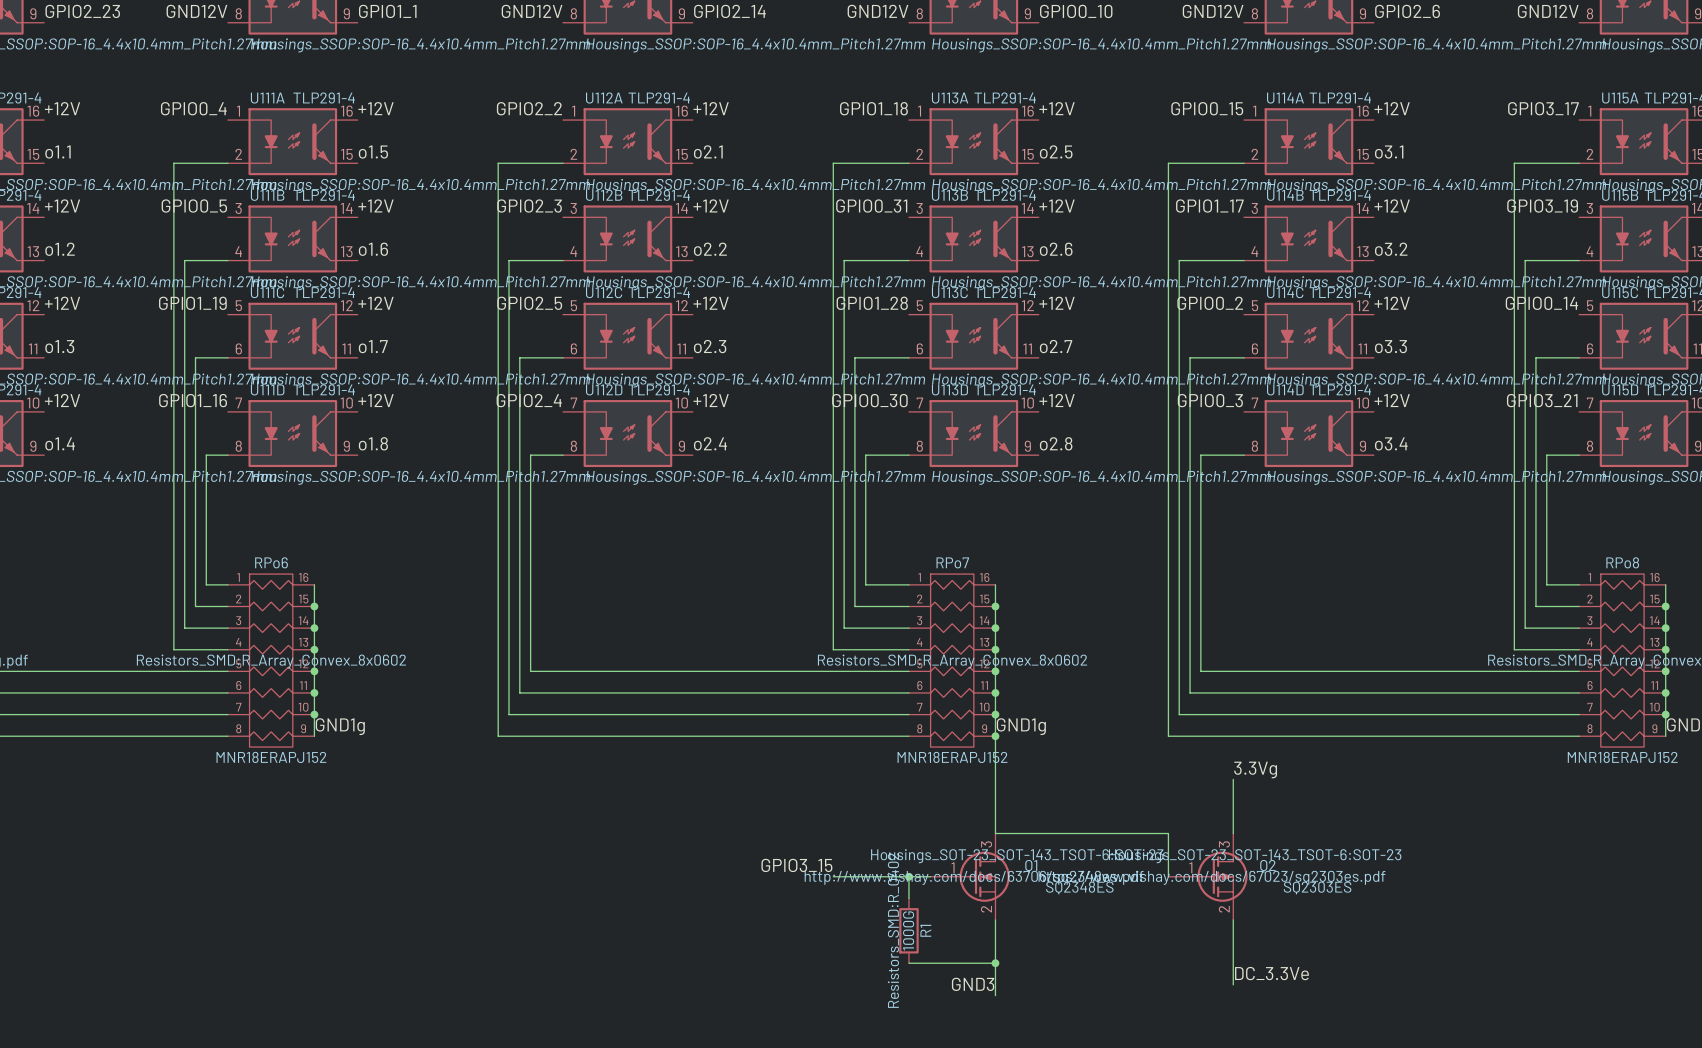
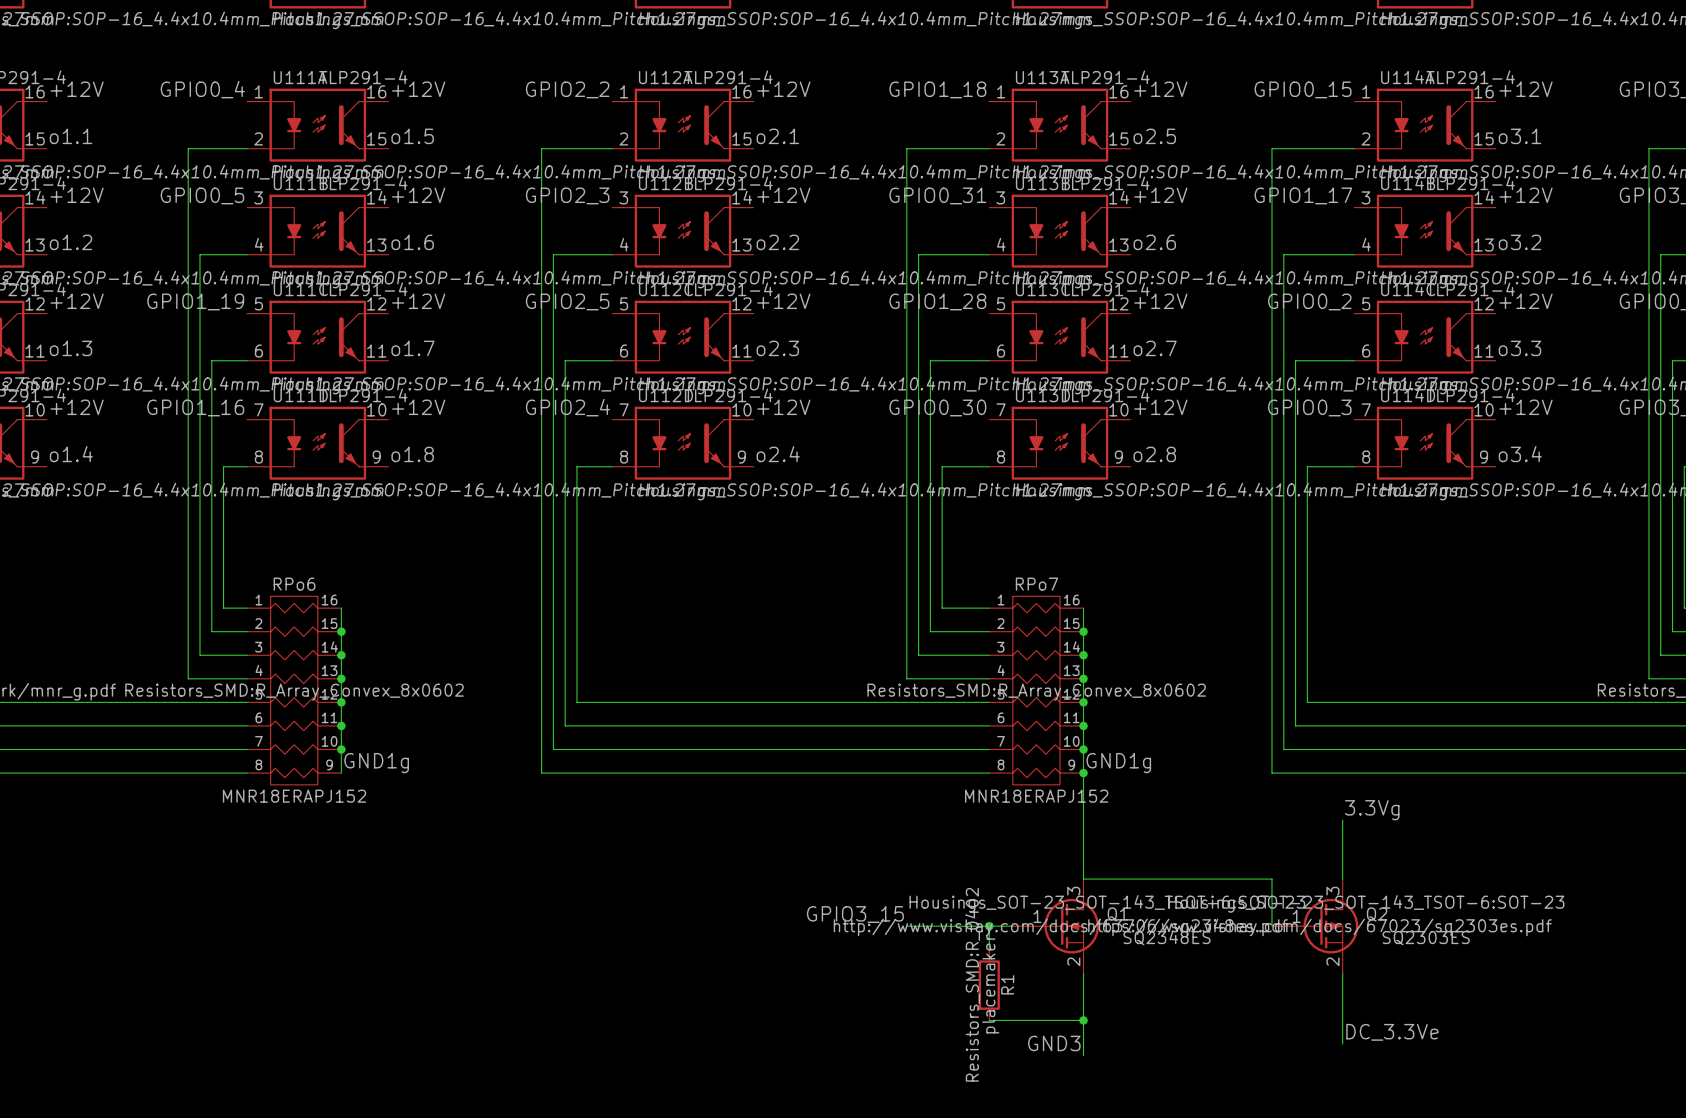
R1 value: 1000G (908, 930) -> placemaker (990, 984)

